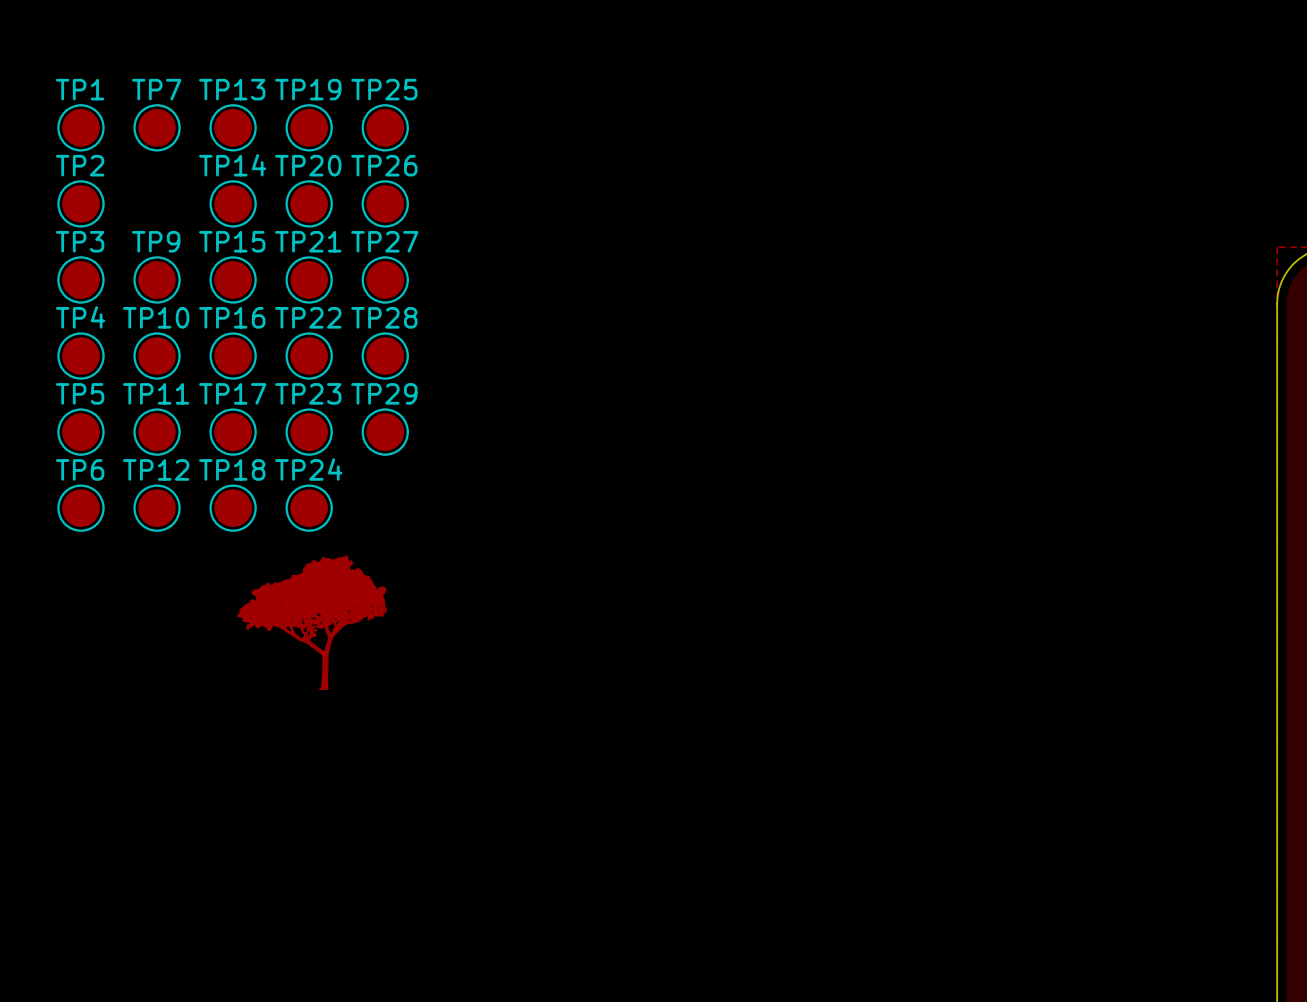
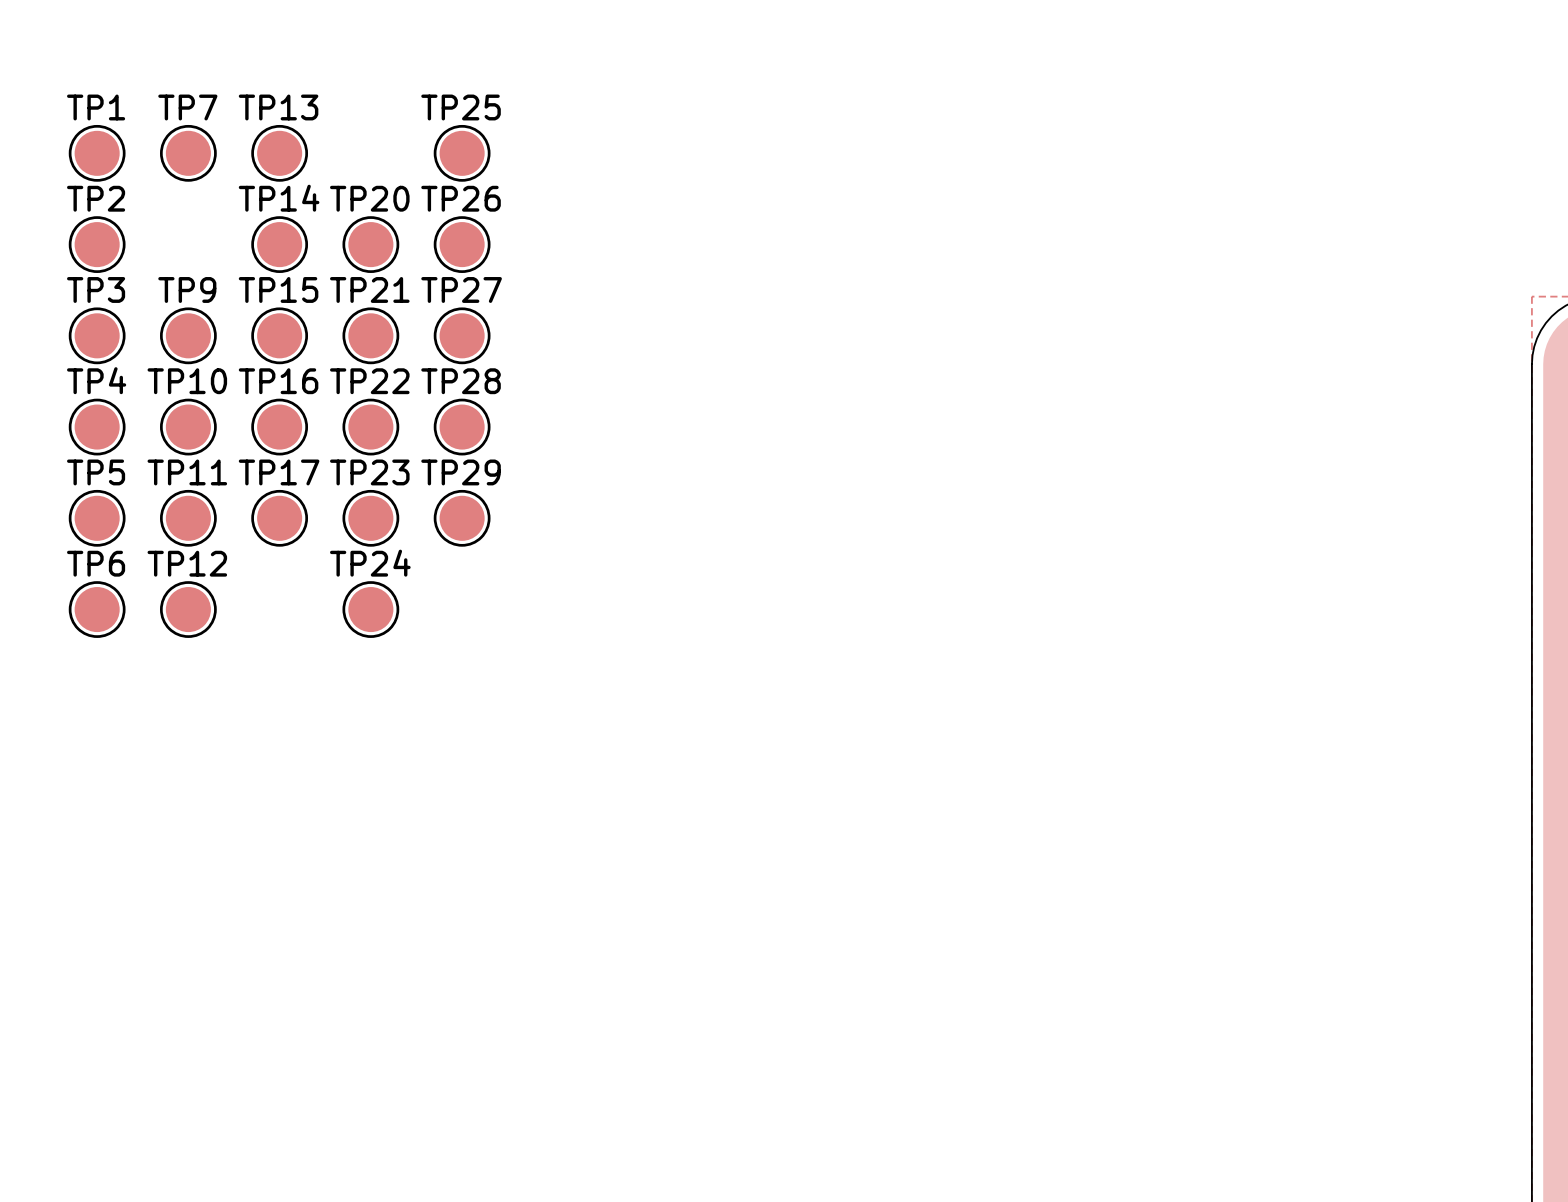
TP19: (309, 127) -> none
TP18: (233, 508) -> none
part: (312, 622) -> none

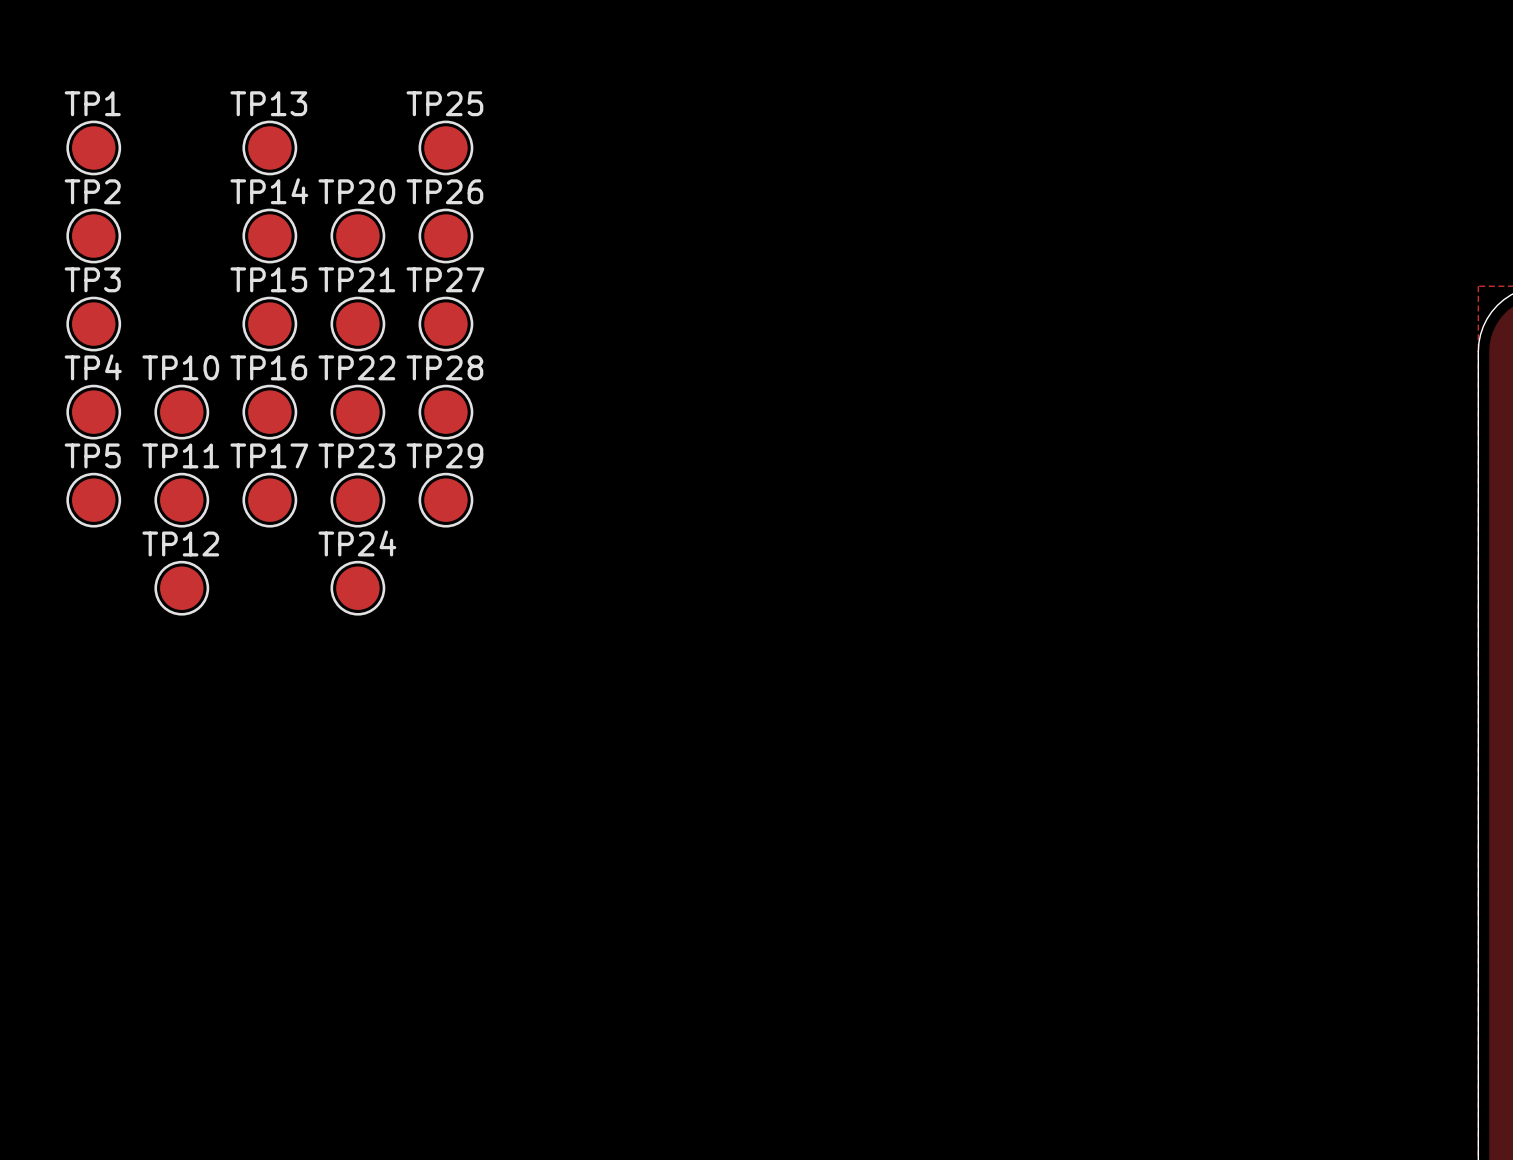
TP7: (188, 153) -> none
TP9: (188, 335) -> none
TP6: (97, 609) -> none

